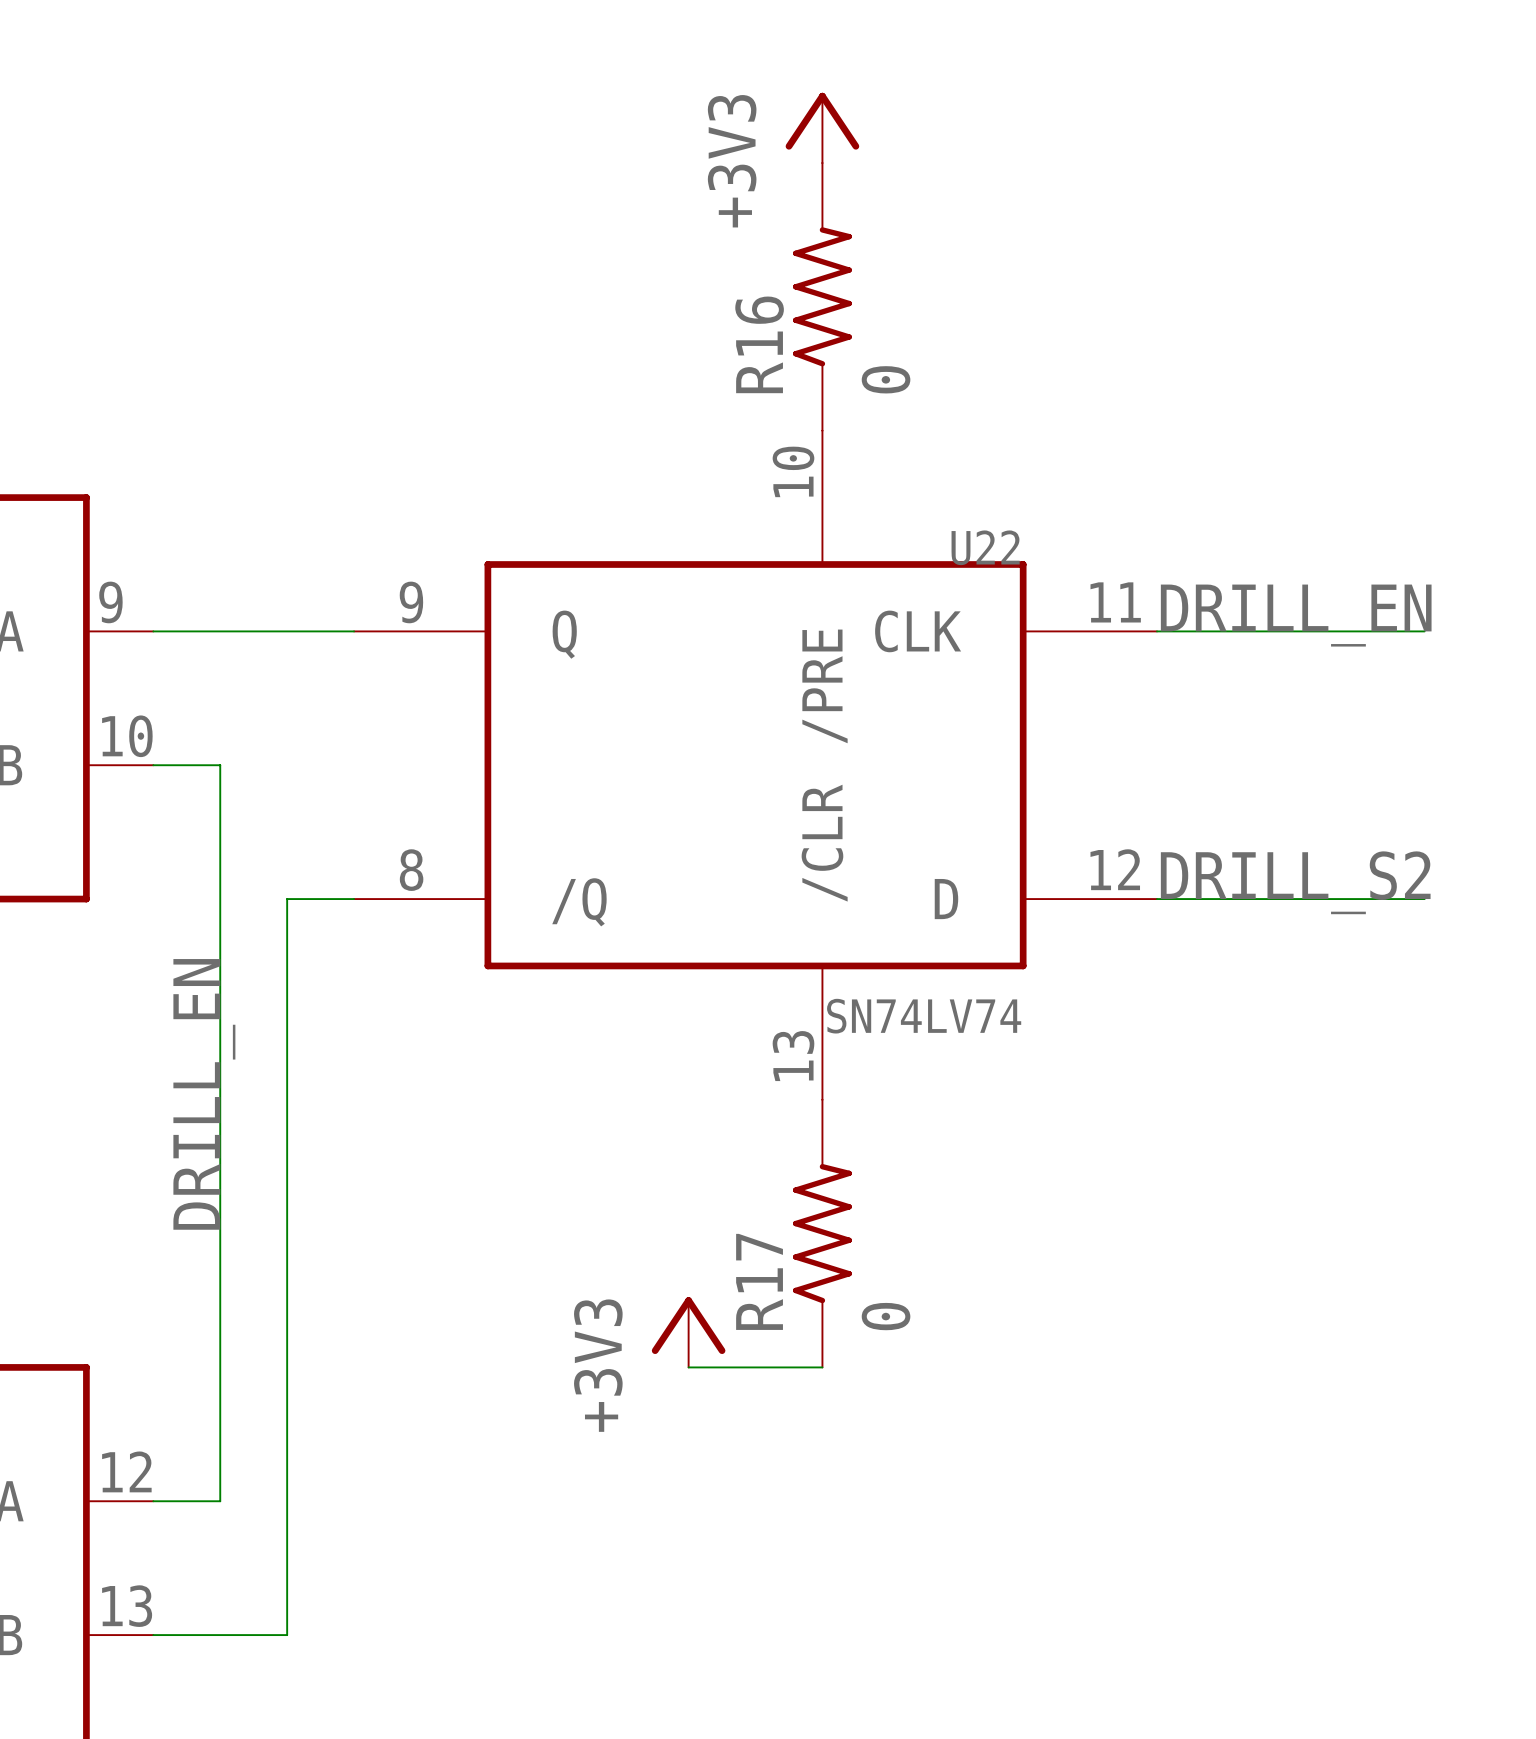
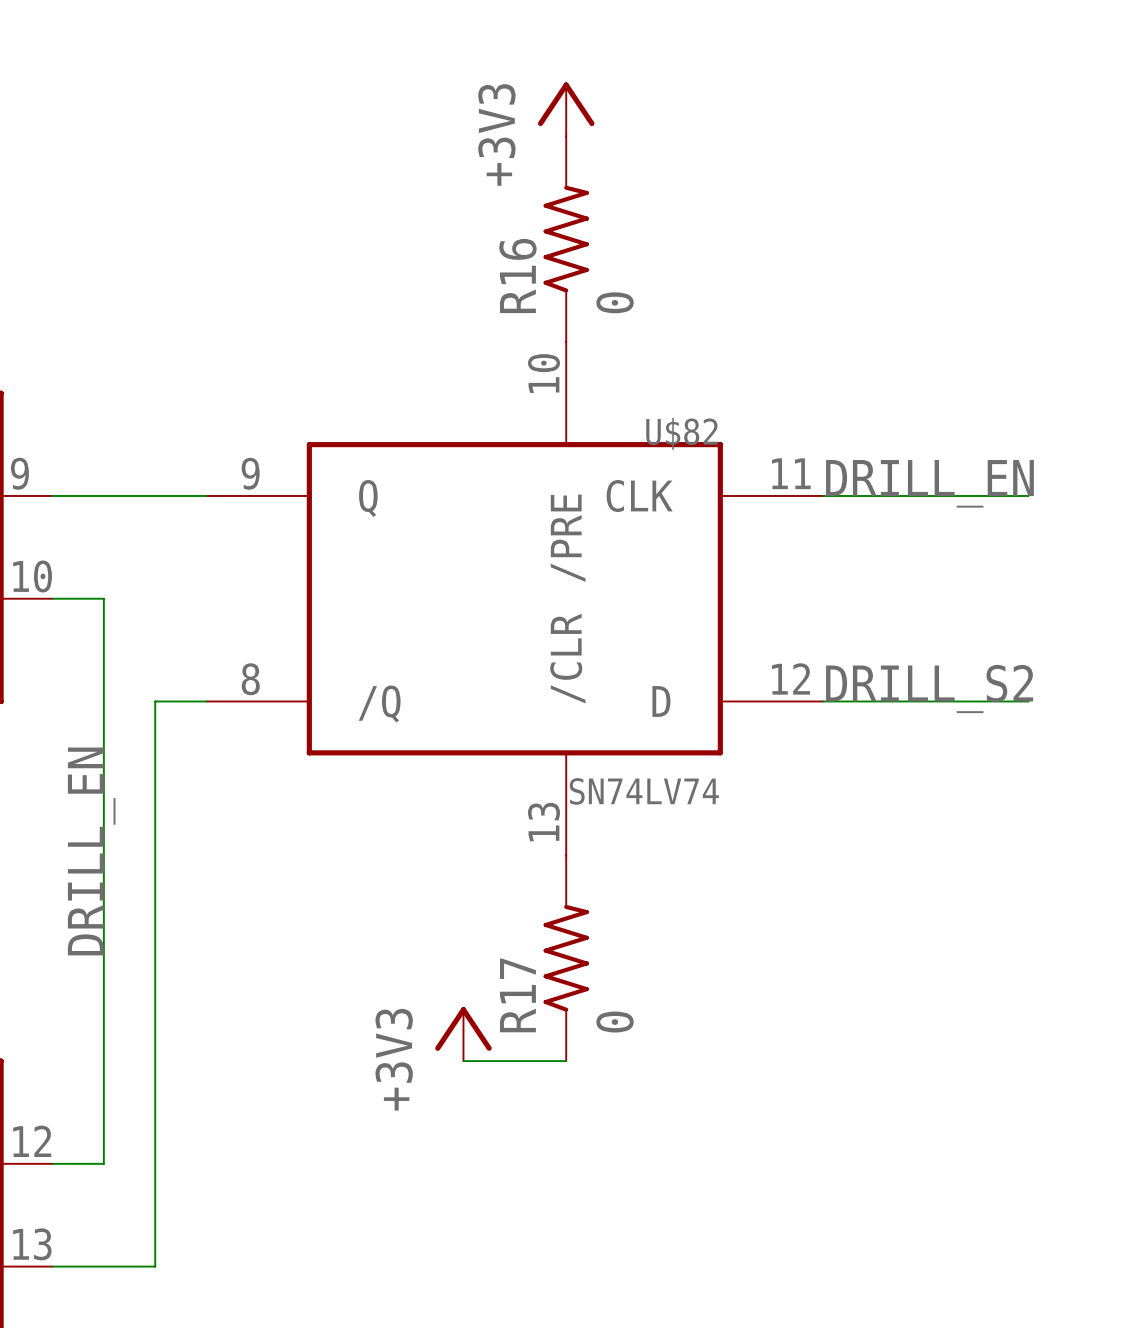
U22 name: U22 (985, 547) -> U$82 (681, 433)

